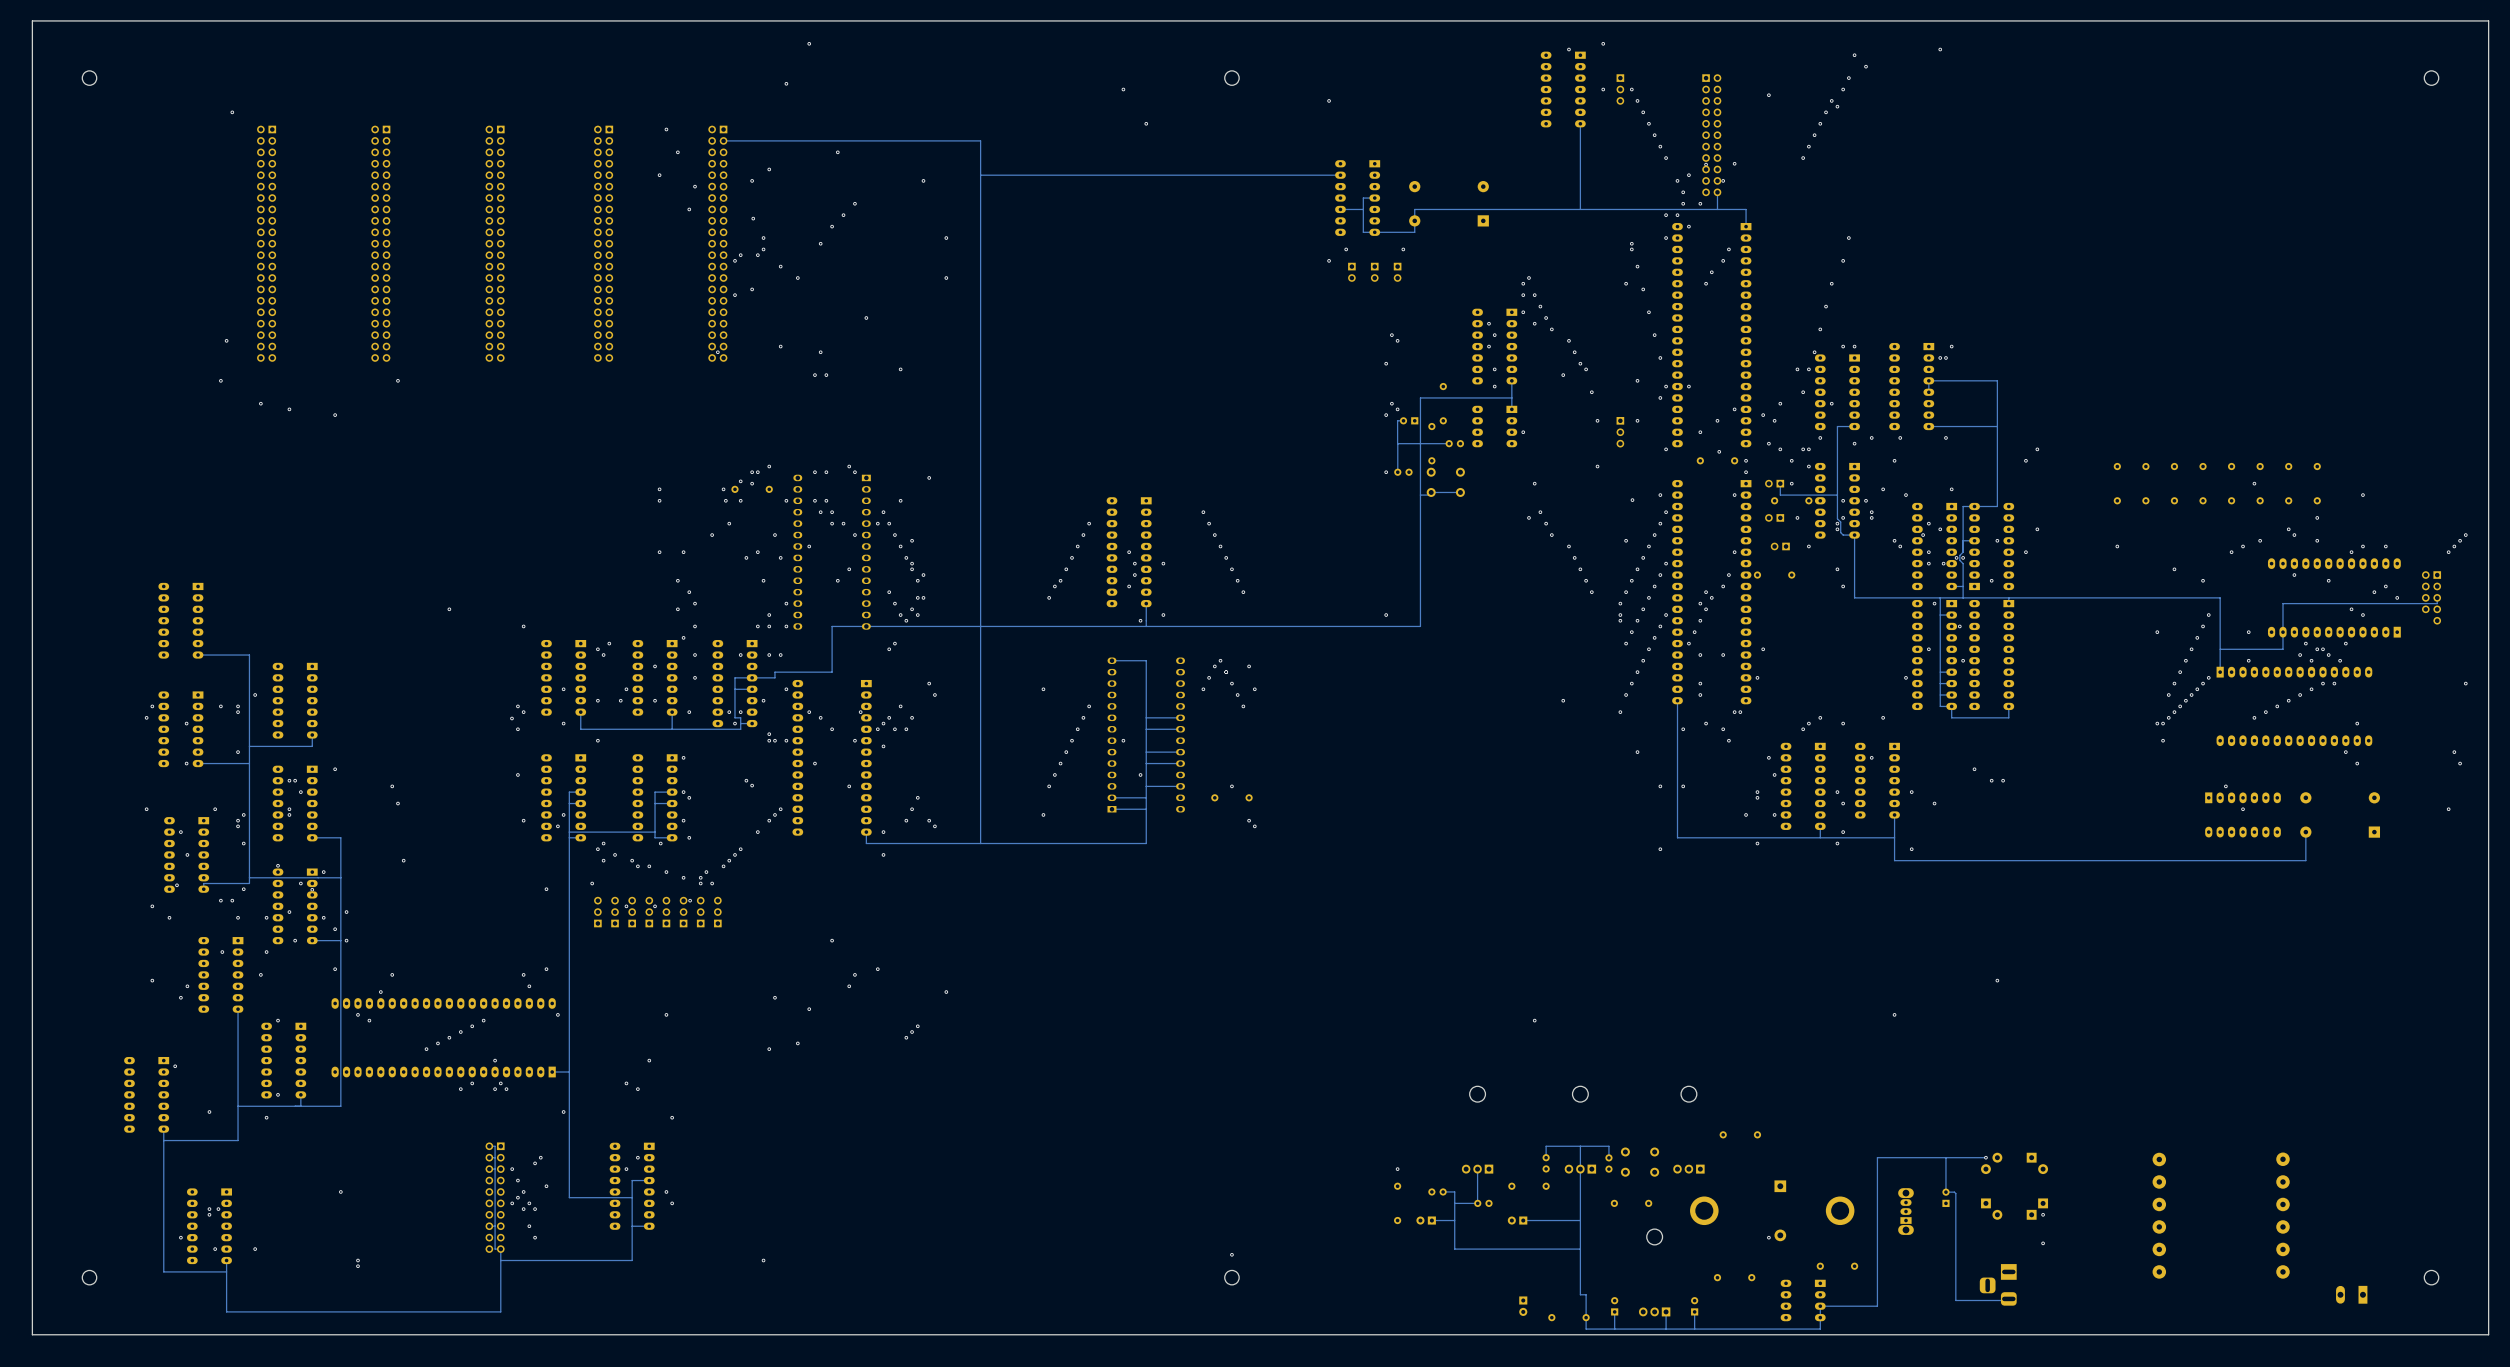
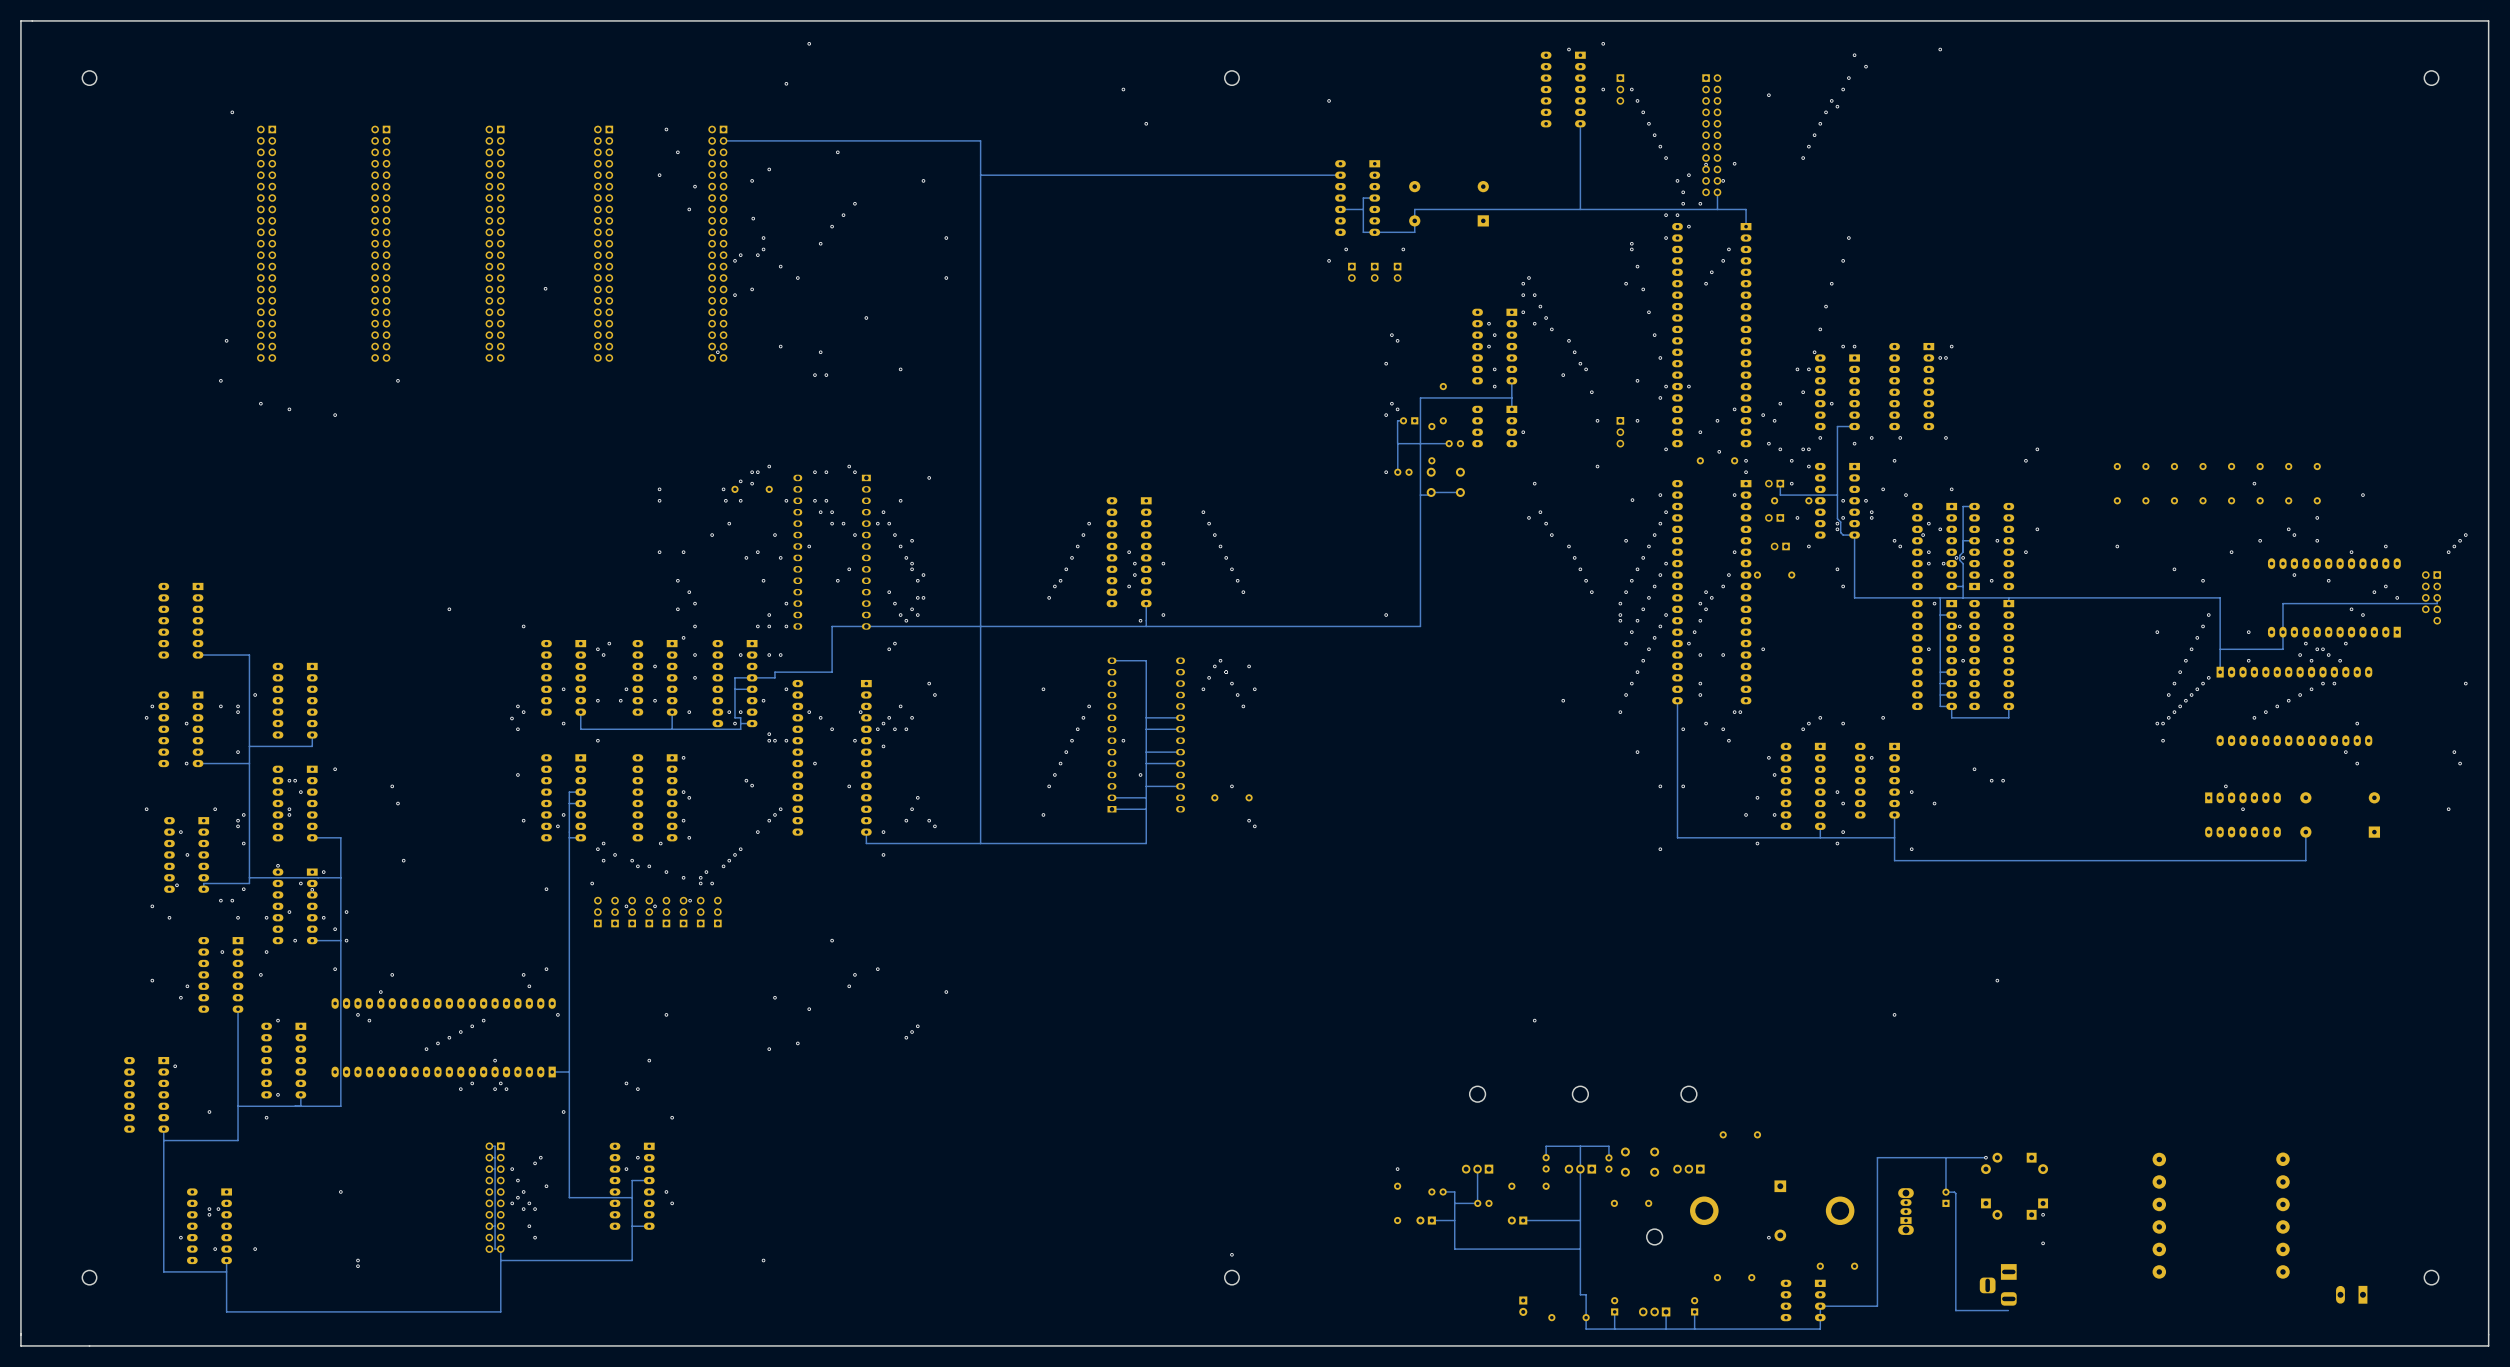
board edge: (32, 20) (32, 1334) (2488, 1334) -> (32, 20) (20, 20) (20, 1345) (2488, 1345) (2488, 1334)
via: none -> (545, 288)
track: (1928, 392) (1928, 380) (1997, 380) (1997, 506) (1974, 506) -> none
track: (1997, 426) (1928, 426) -> none
via: (2243, 546) -> none
via: (2362, 546) -> none
via: (1757, 677) -> none
via: (1905, 677) -> none
track: (672, 792) (655, 792) (655, 837) (672, 837) -> none
via: (1757, 792) -> none
track: (672, 803) (655, 803) -> none
track: (655, 832) (569, 832) -> none
track: (2008, 1298) (2007, 1300) (1955, 1300) -> (1955, 1310) (1955, 1300)
track: none -> (2008, 1310) (1955, 1310)

